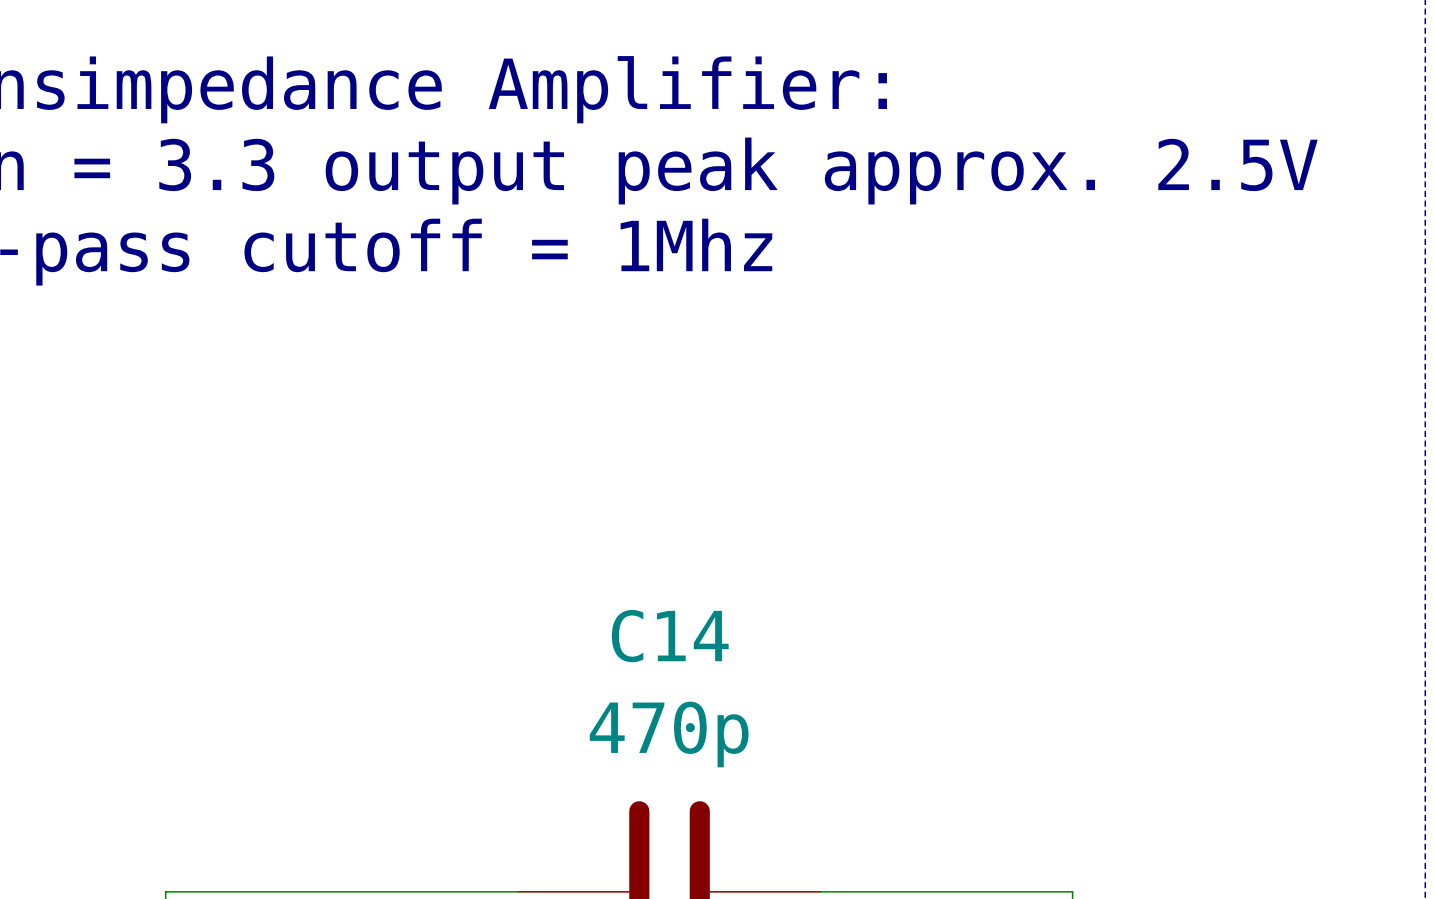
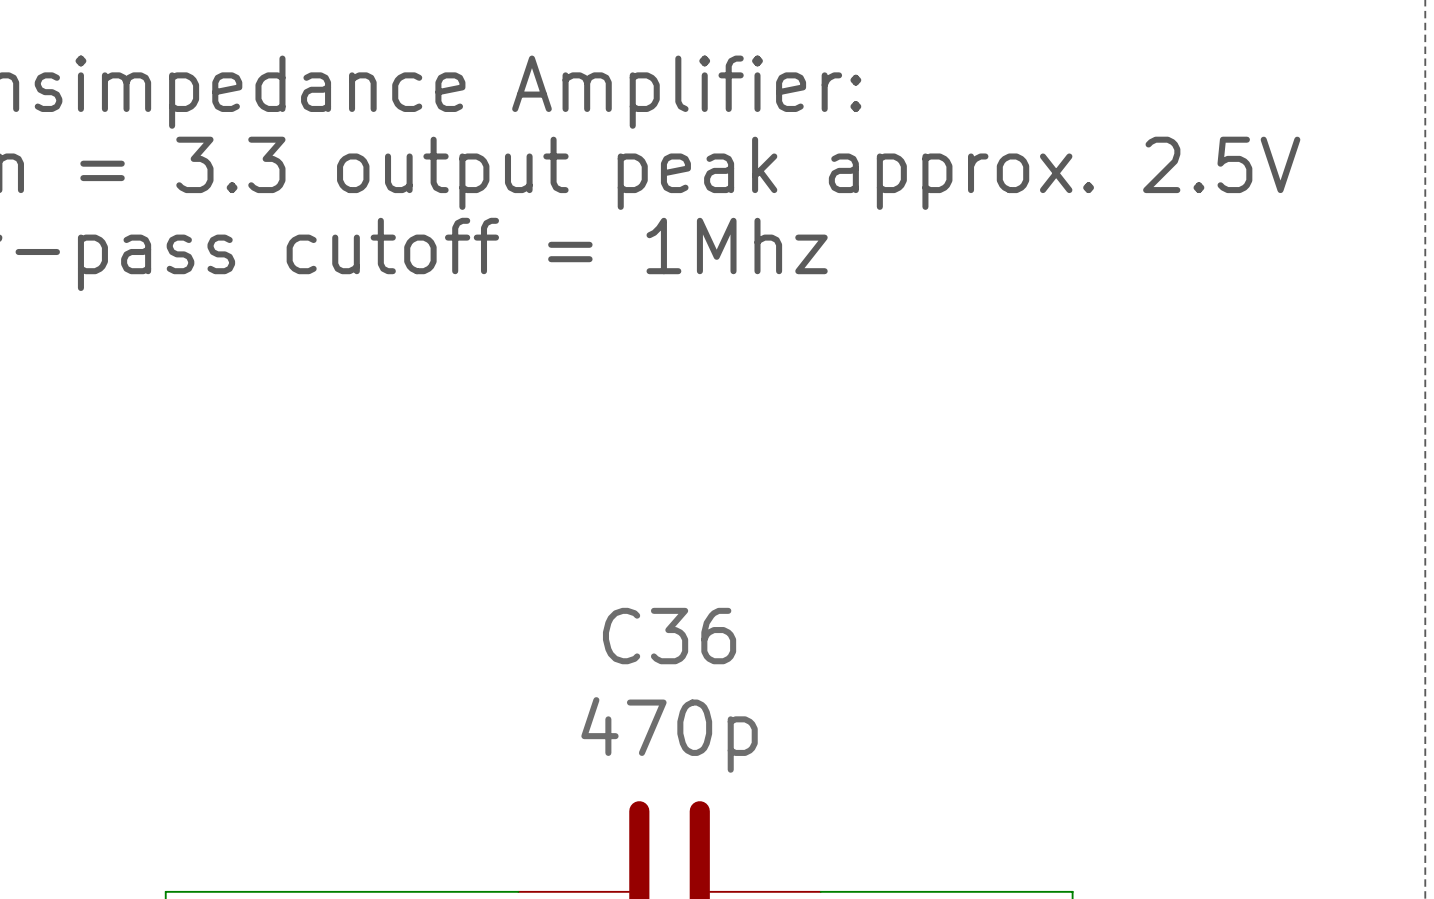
C14 name: C14 (670, 636) -> C36 (669, 636)

